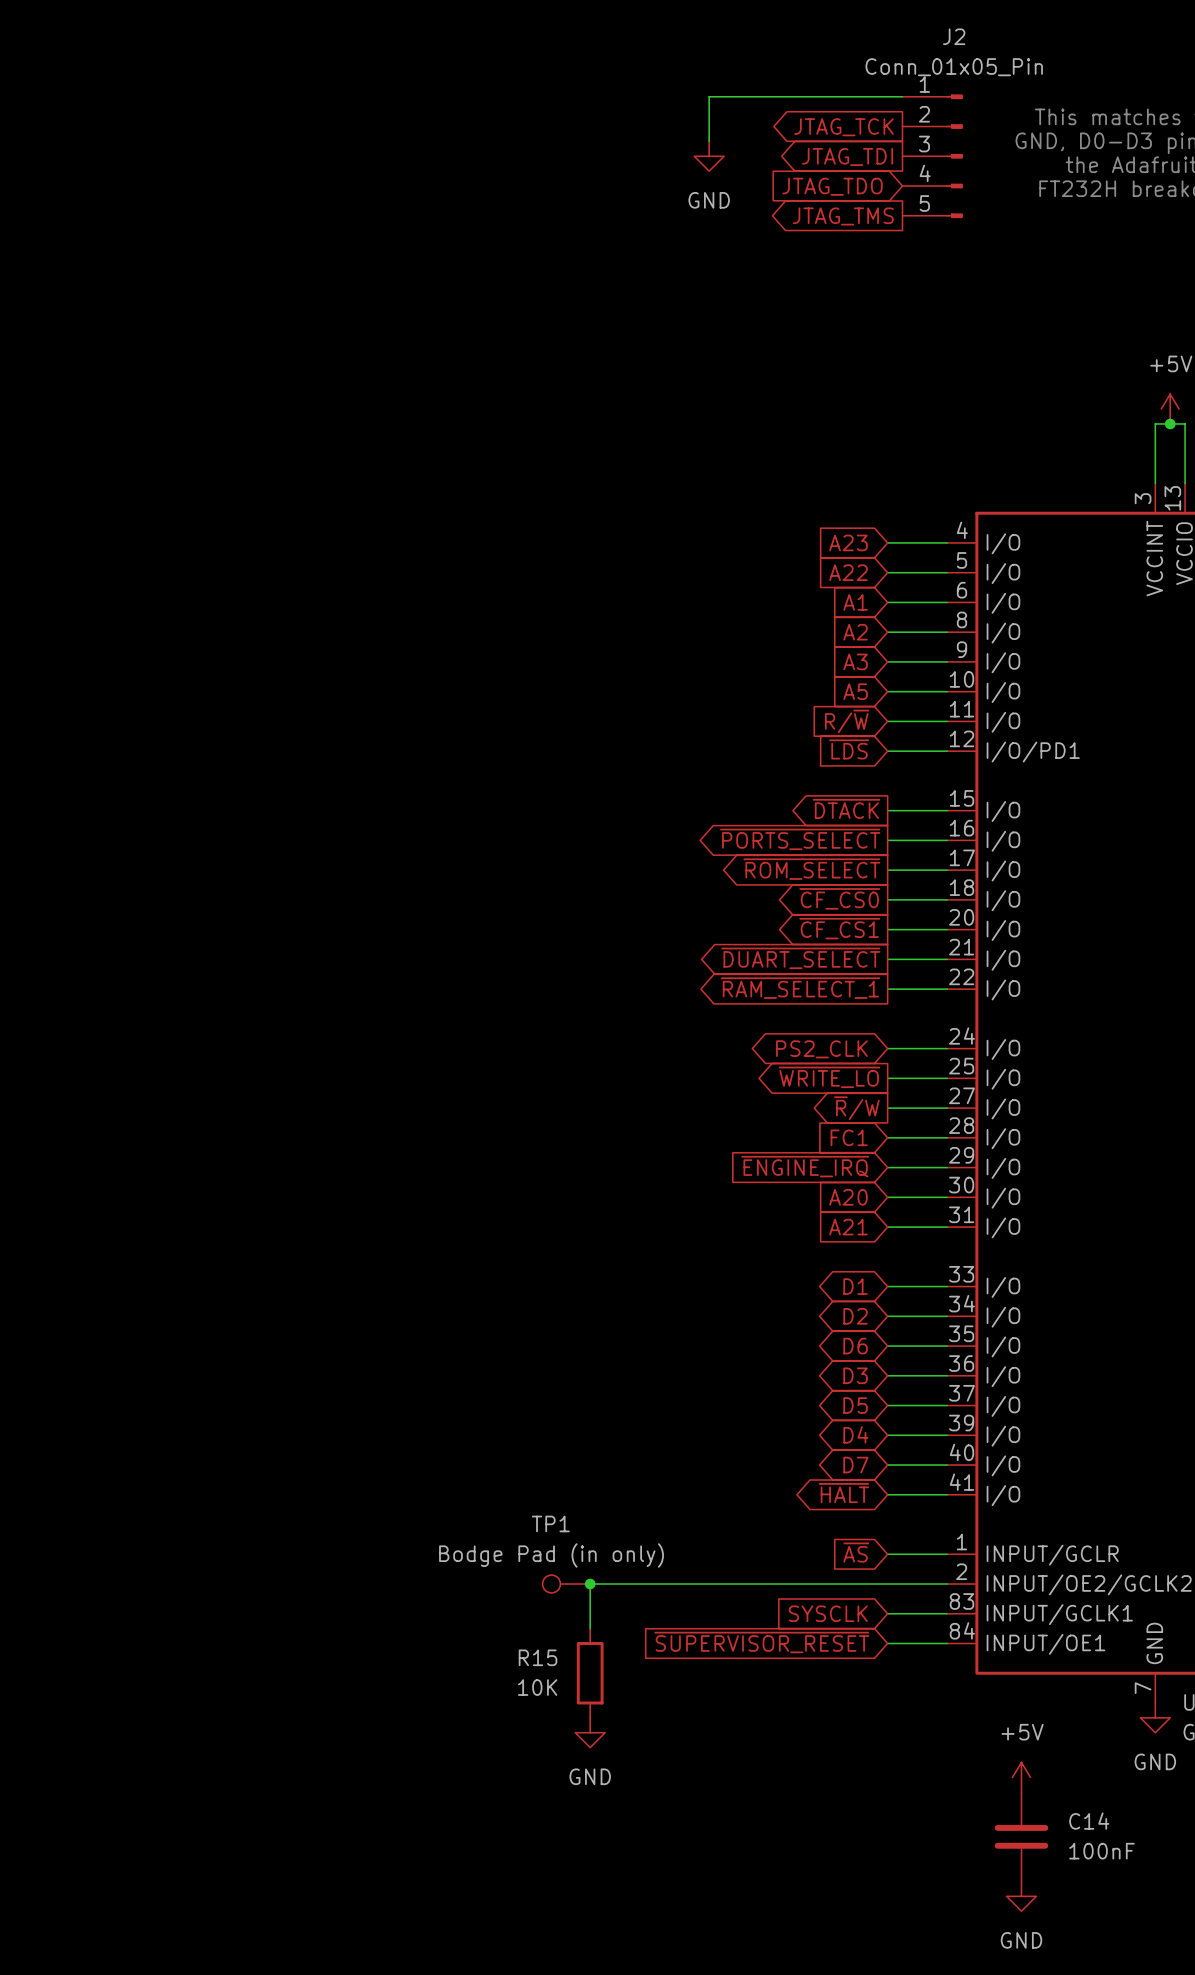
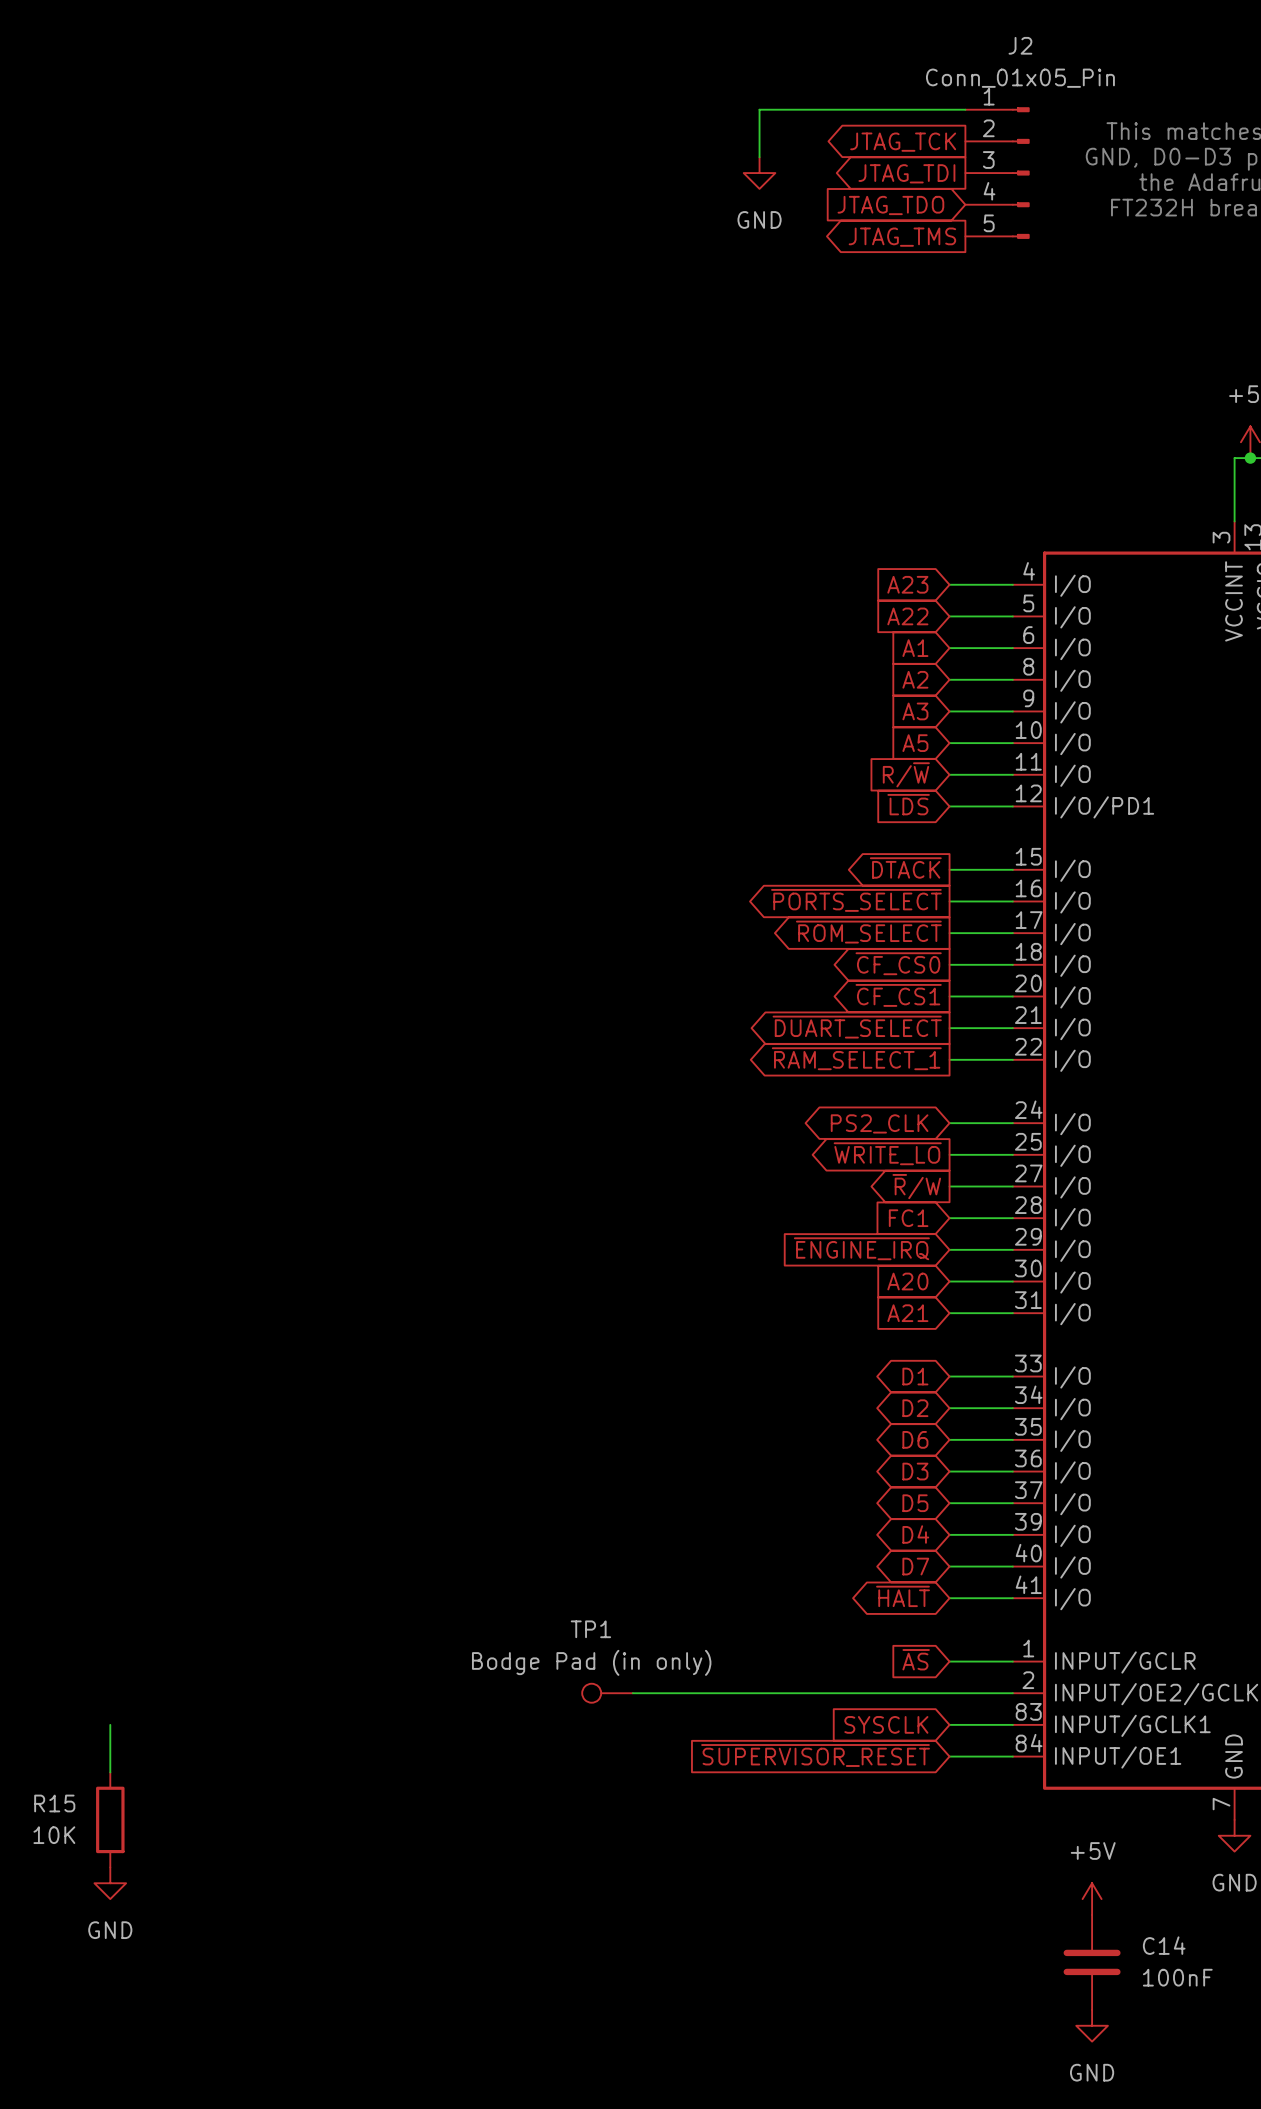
wire: (590, 1584) (590, 1628) -> none
junction: (590, 1584) -> none
wire: none -> (110, 1724) (110, 1772)
R15 position: (590, 1673) -> (110, 1819)
power symbol: GND (590, 1732) -> none
power symbol: none -> GND (110, 1883)

